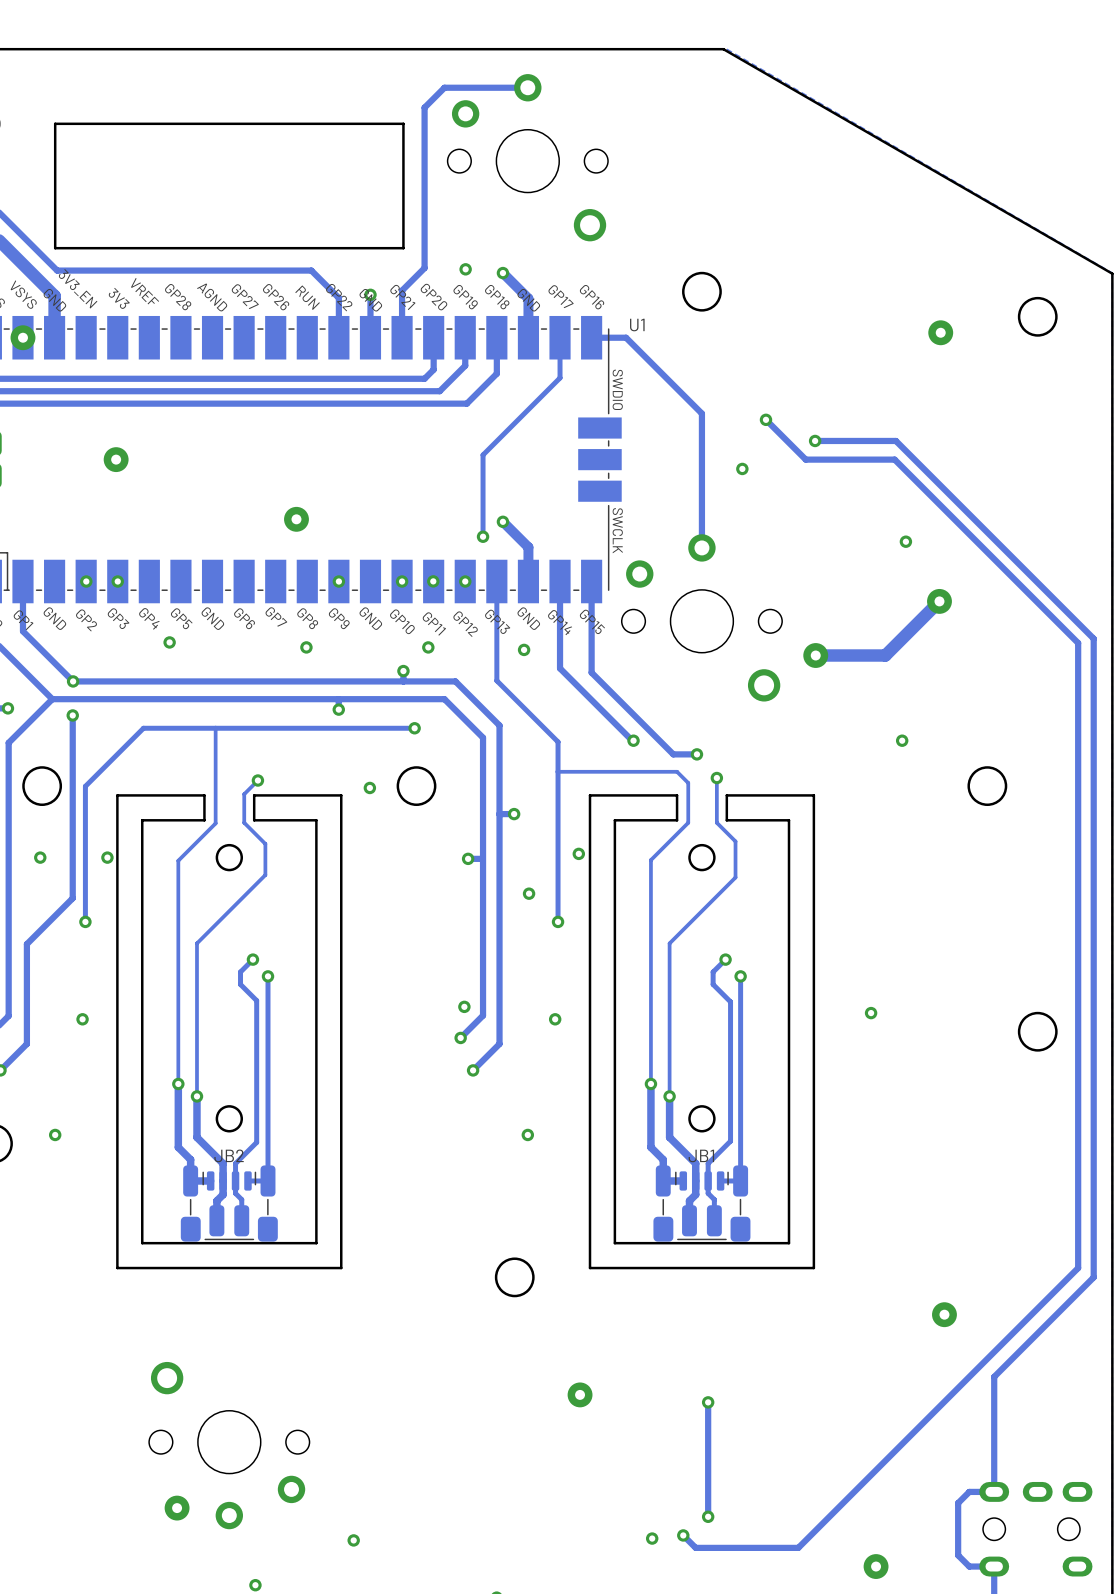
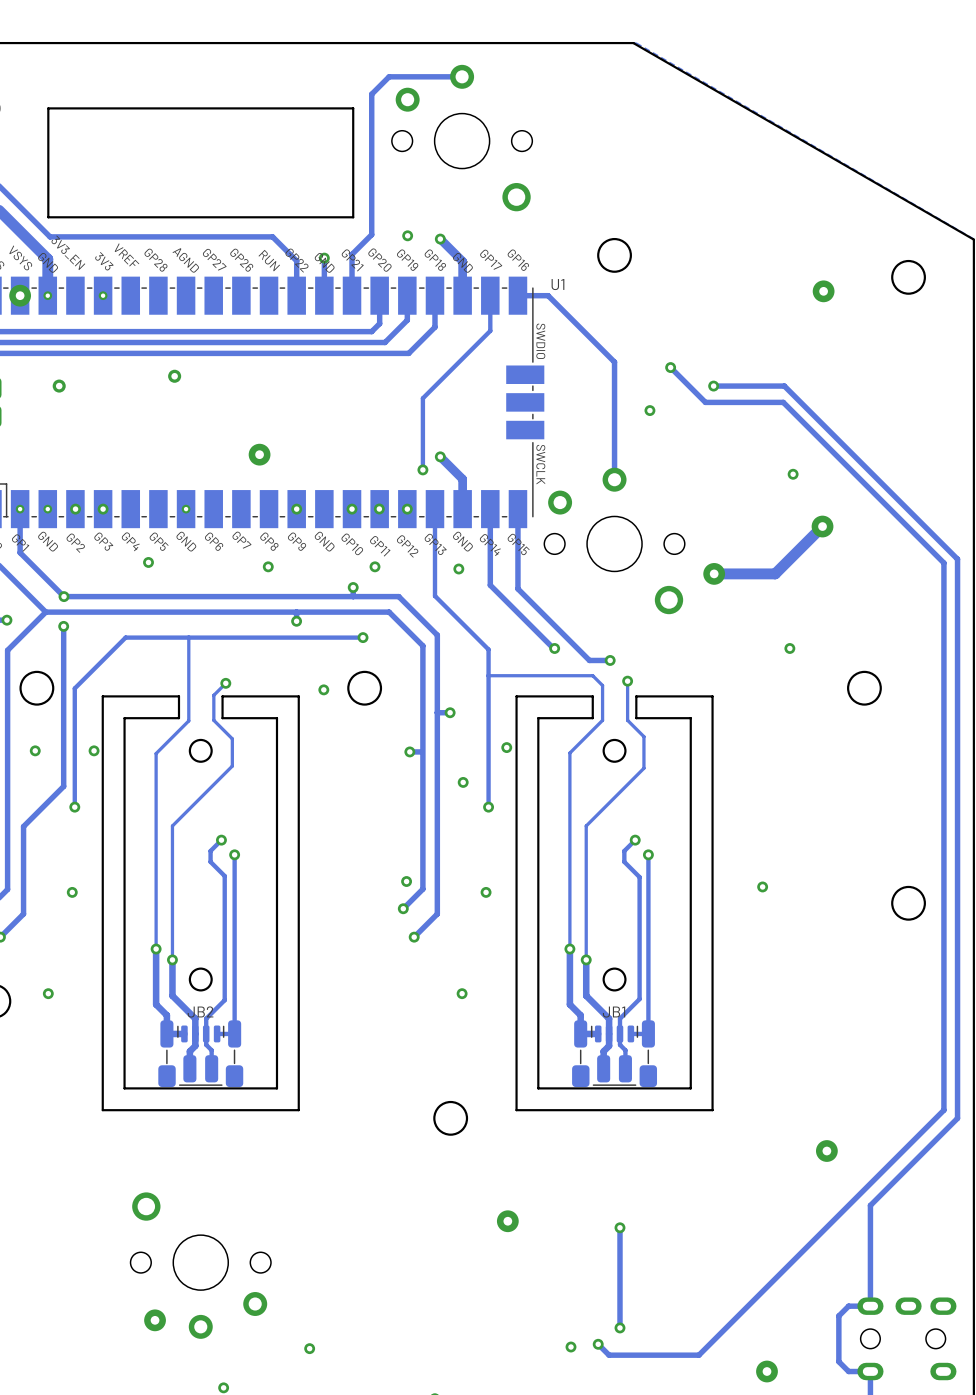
via: none -> (47, 295)
via: none -> (103, 295)
via: none -> (174, 376)
via: none -> (59, 386)
via: (116, 459) -> none
via: none -> (20, 509)
via: none -> (47, 509)
via: none -> (186, 509)

